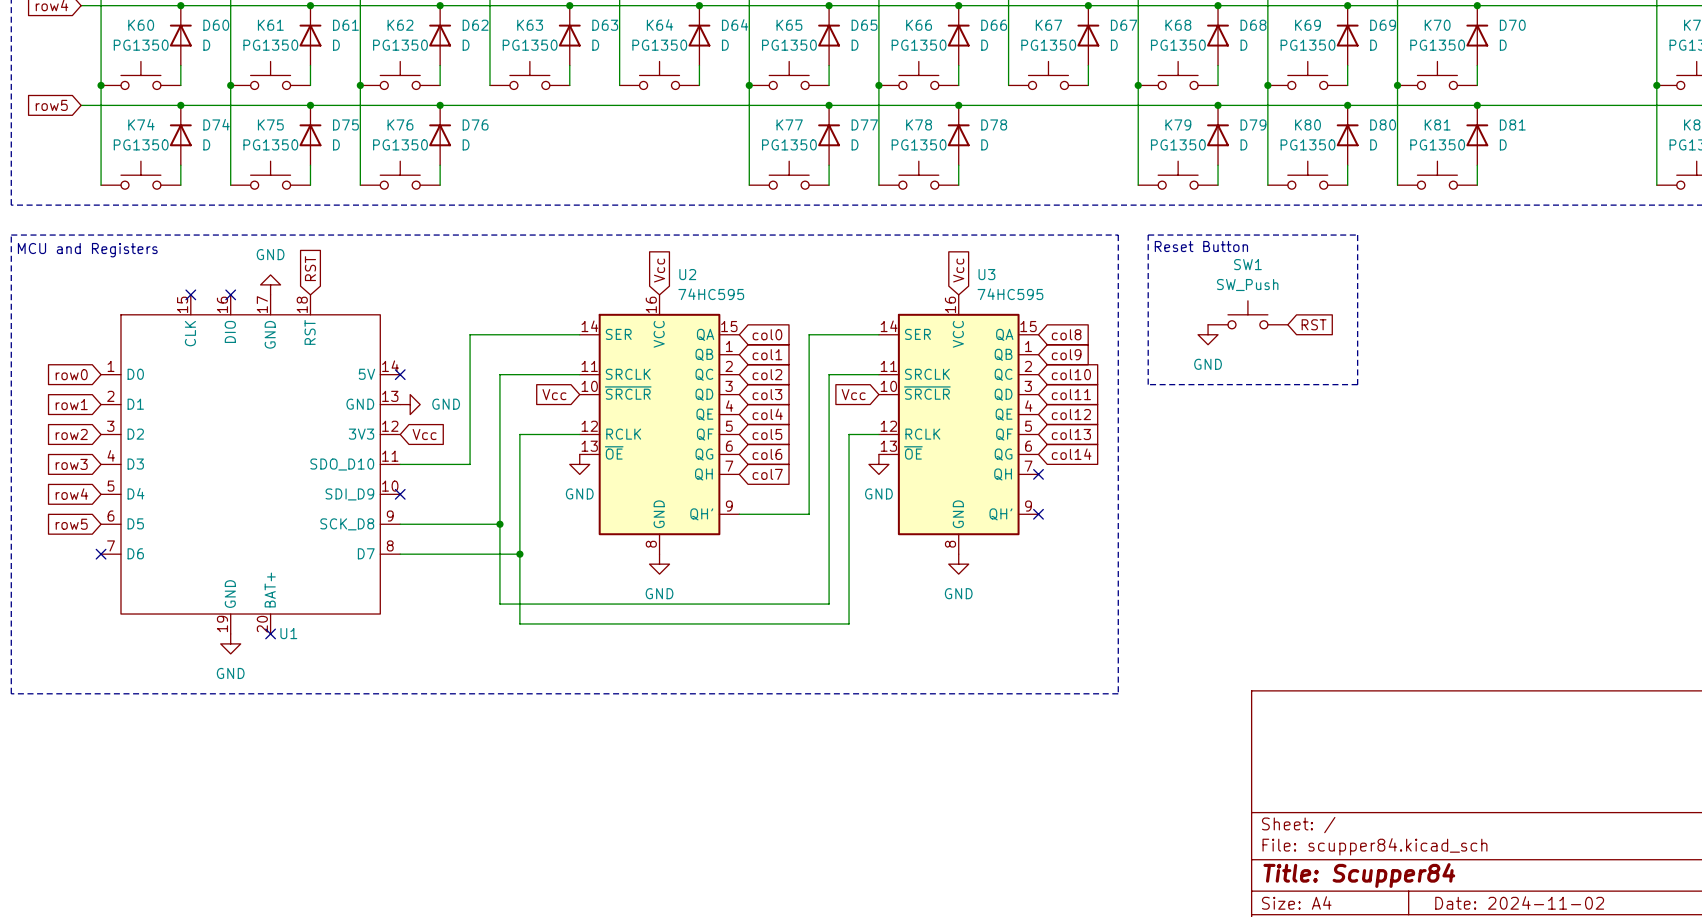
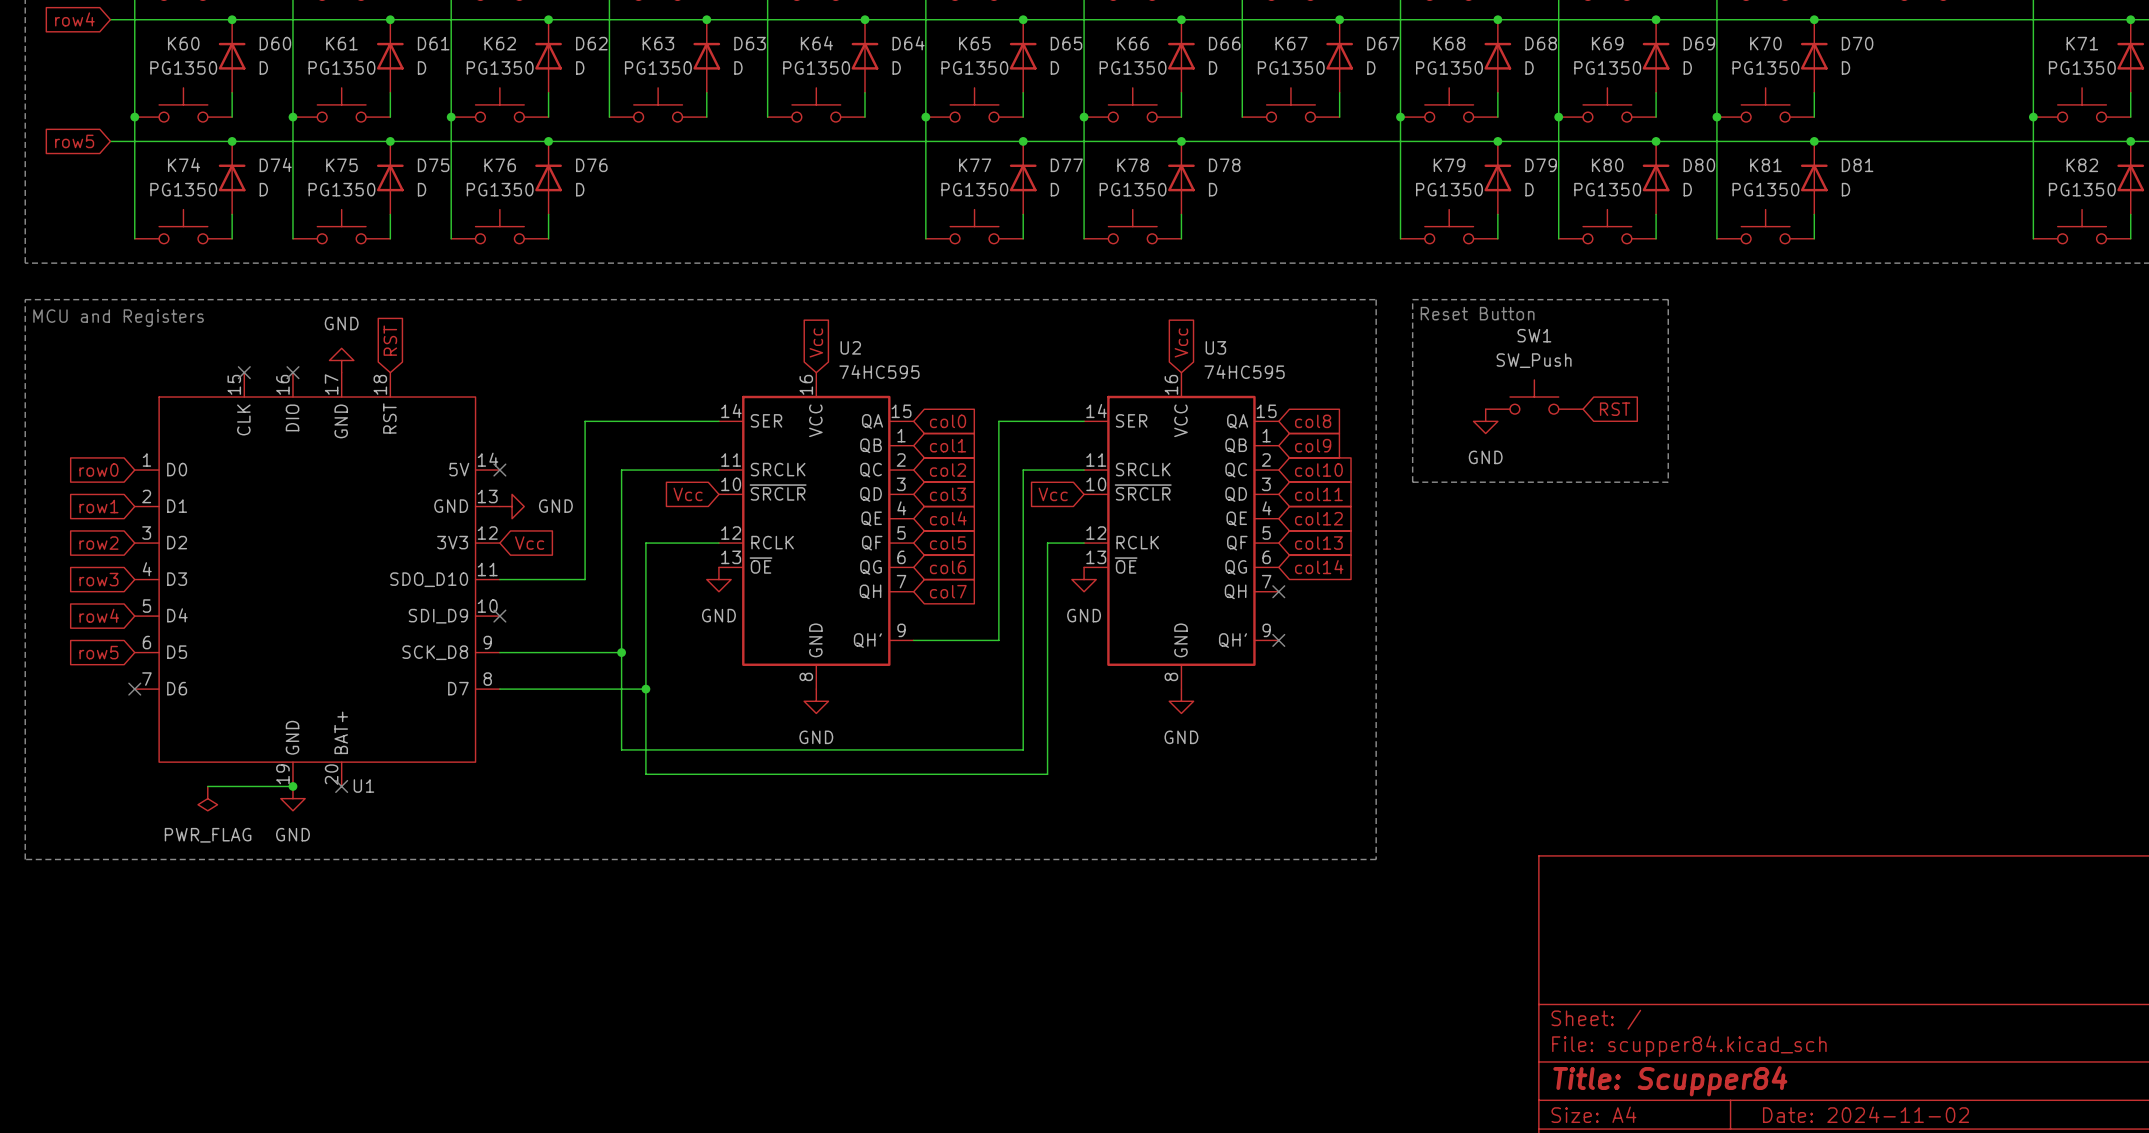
wire: none -> (207, 786) (292, 786)
junction: none -> (292, 786)
power symbol: none -> PWR_FLAG (207, 798)

